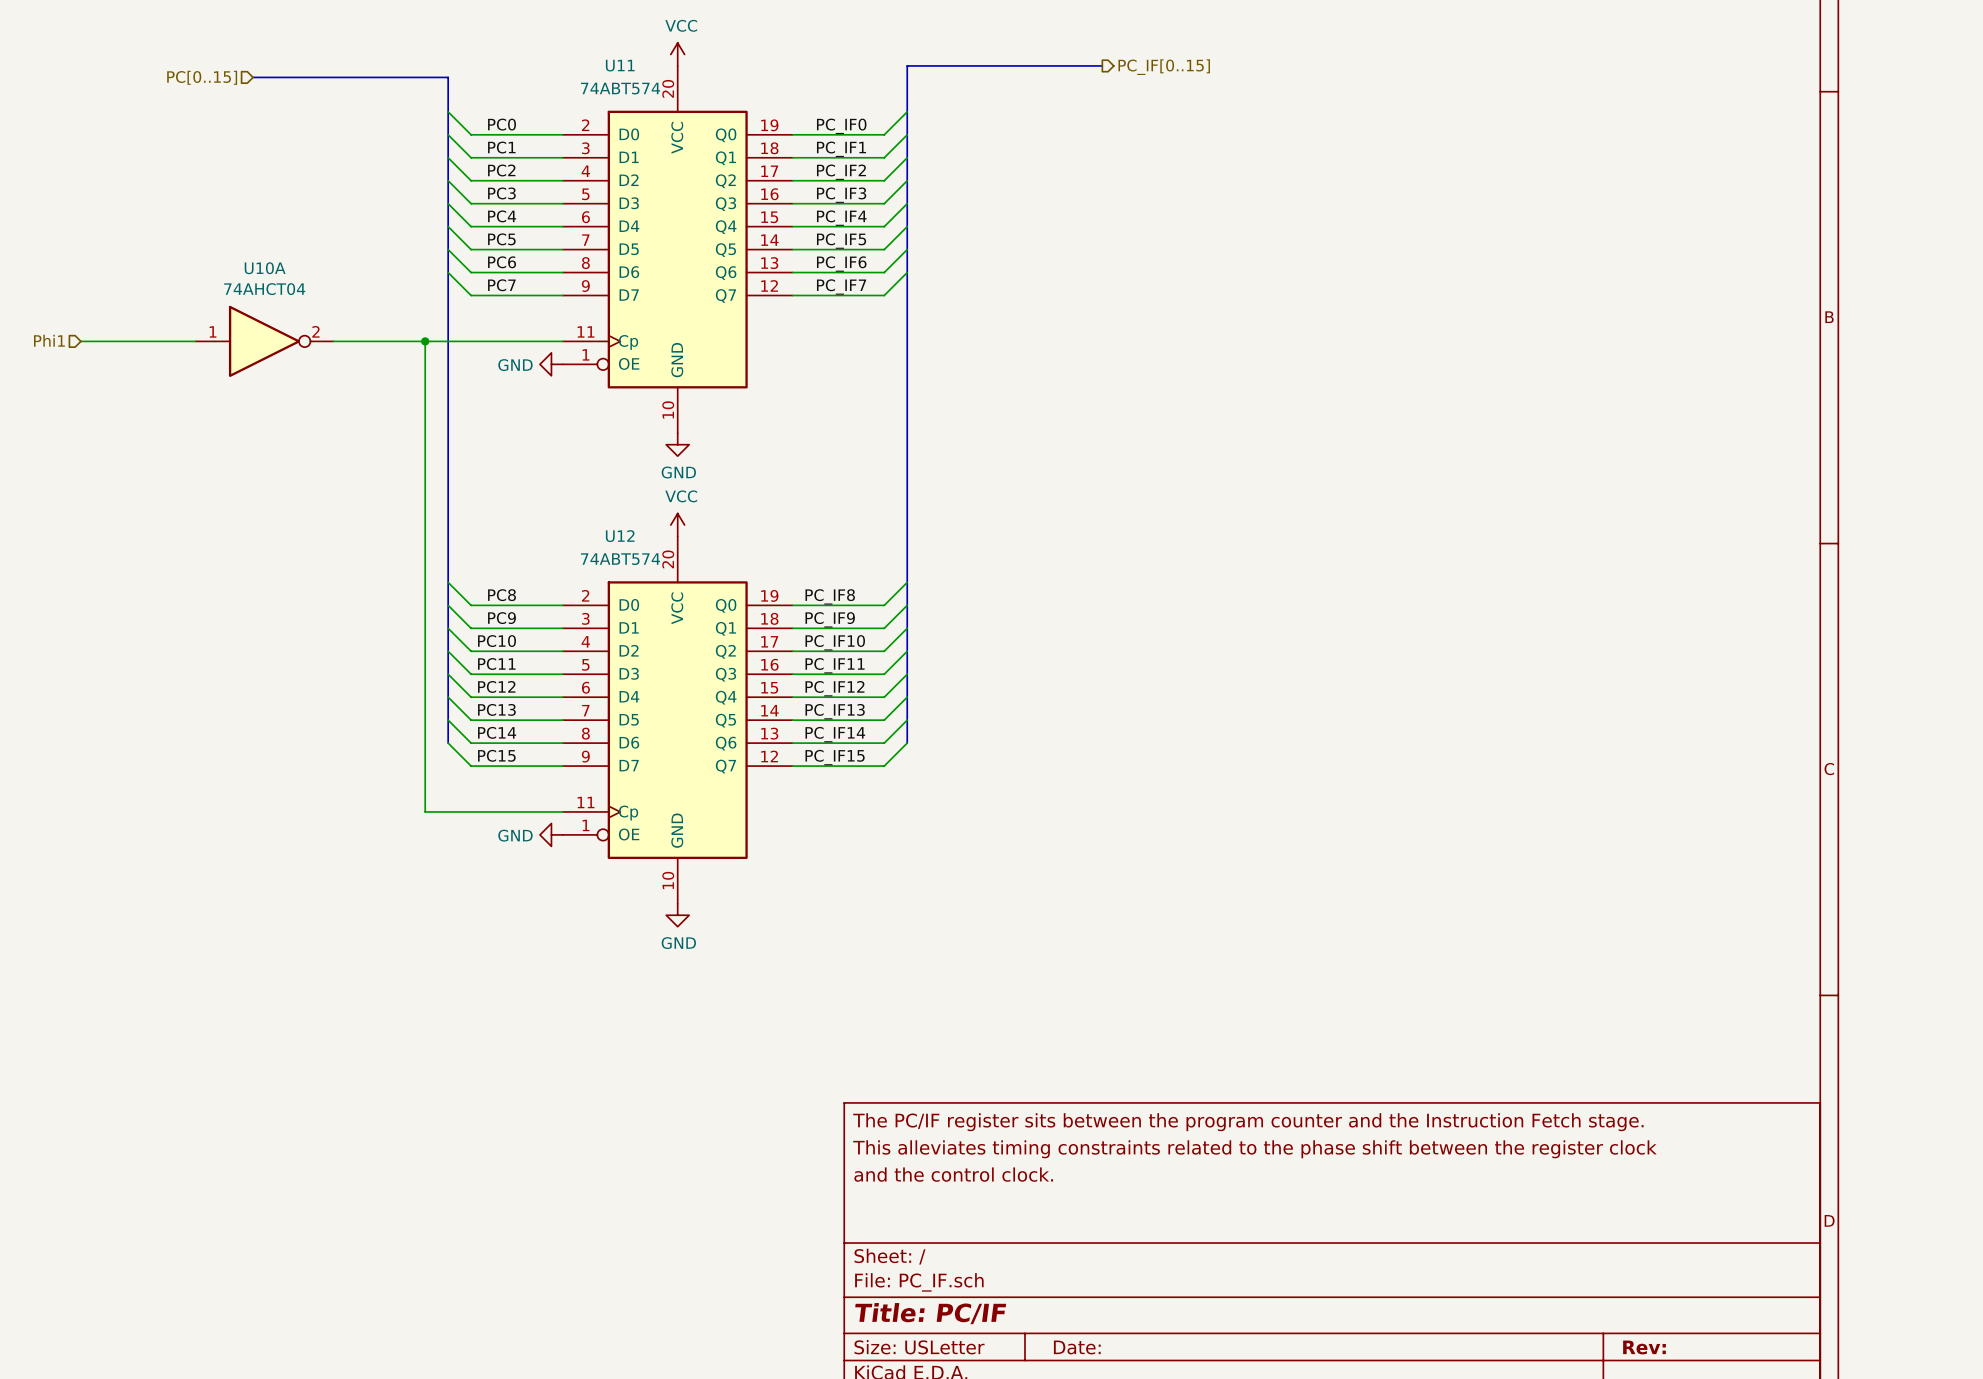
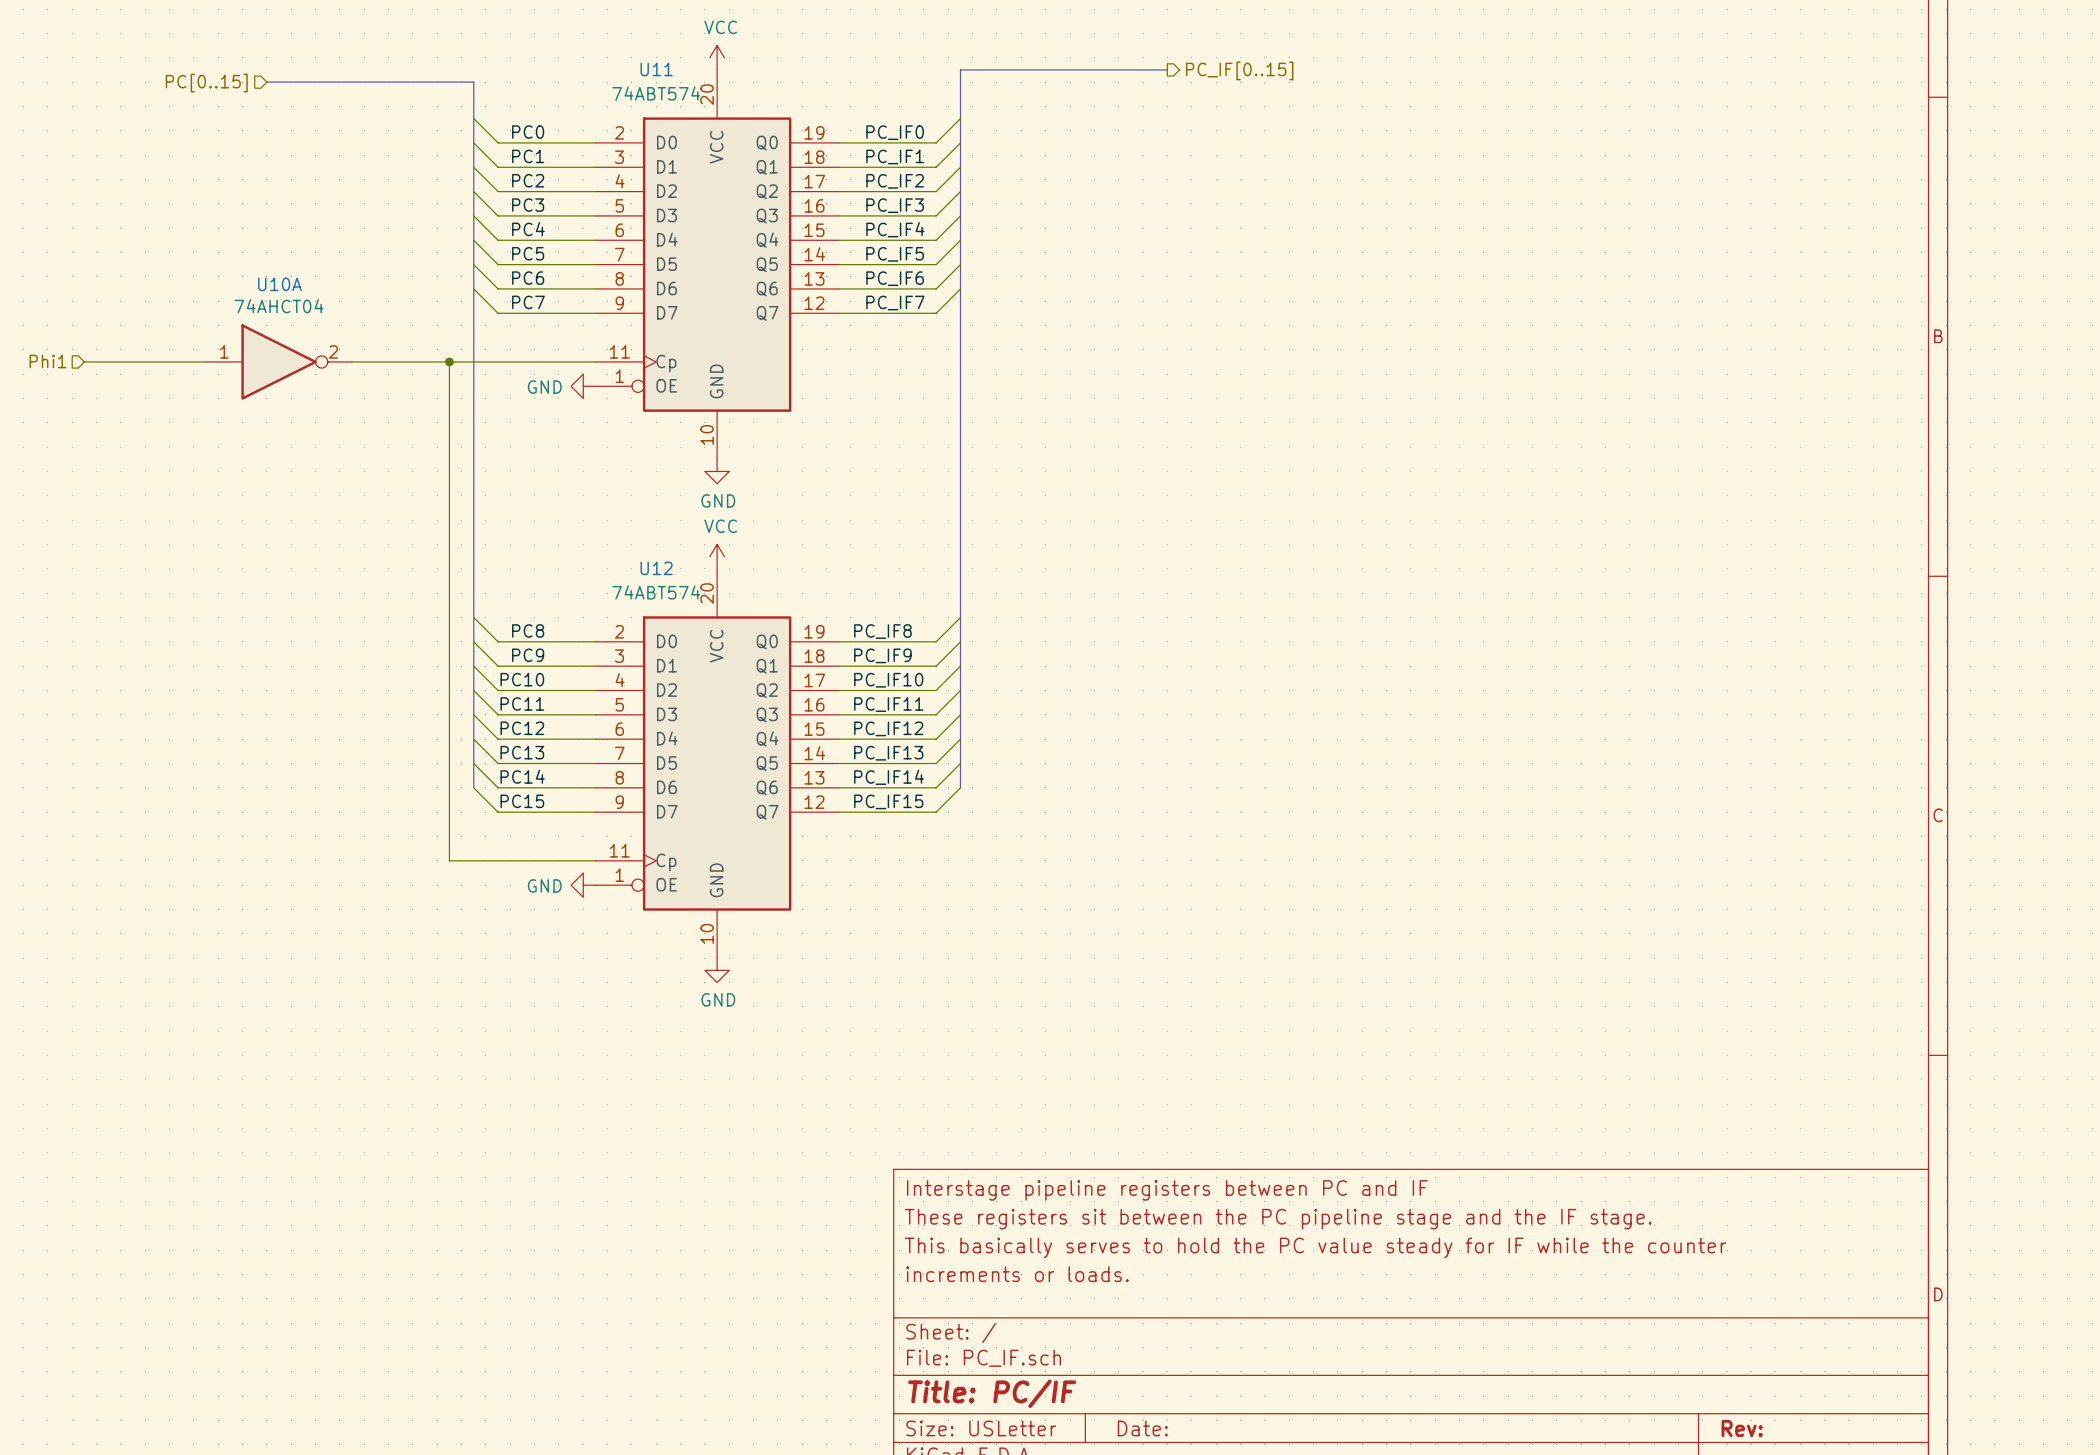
title block: The PC/IF register sits between the program counter and the Instruction Fetch stage. (1248, 1122) -> Interstage pipeline registers between PC and IF (1167, 1190)
title block: This alleviates timing constraints related to the phase shift between the register clock (1254, 1149) -> These registers sit between the PC pipeline stage and the IF stage. (1278, 1219)
title block: and the control clock. (953, 1174) -> This basically serves to hold the PC value steady for IF while the counter (1315, 1247)
title block: none -> increments or loads. (1017, 1274)

